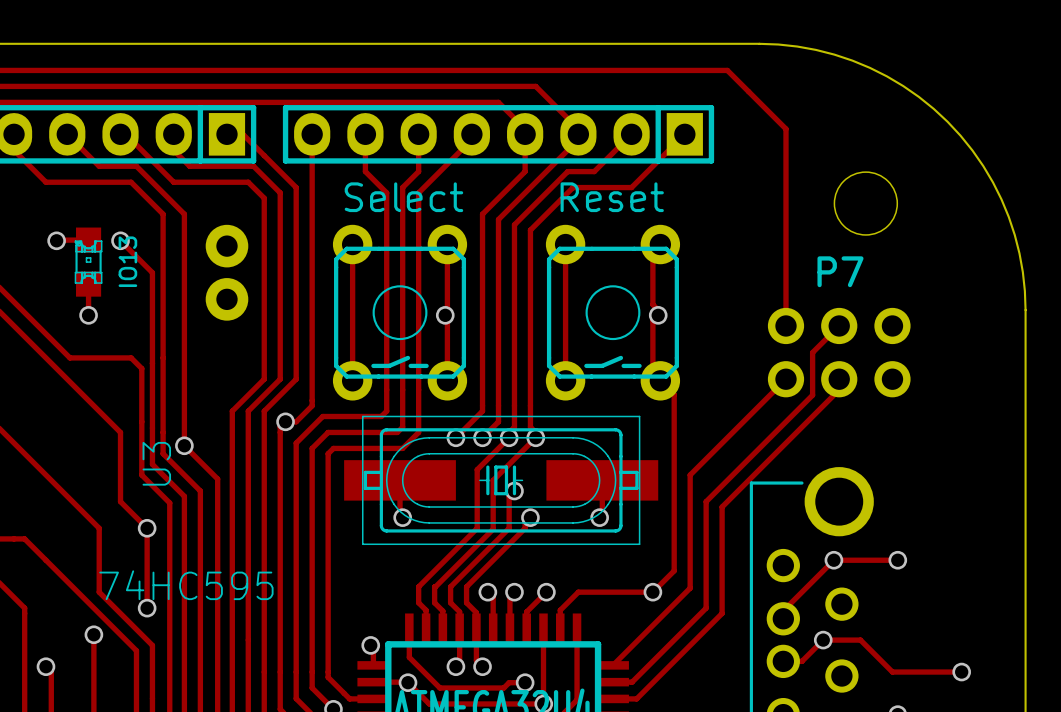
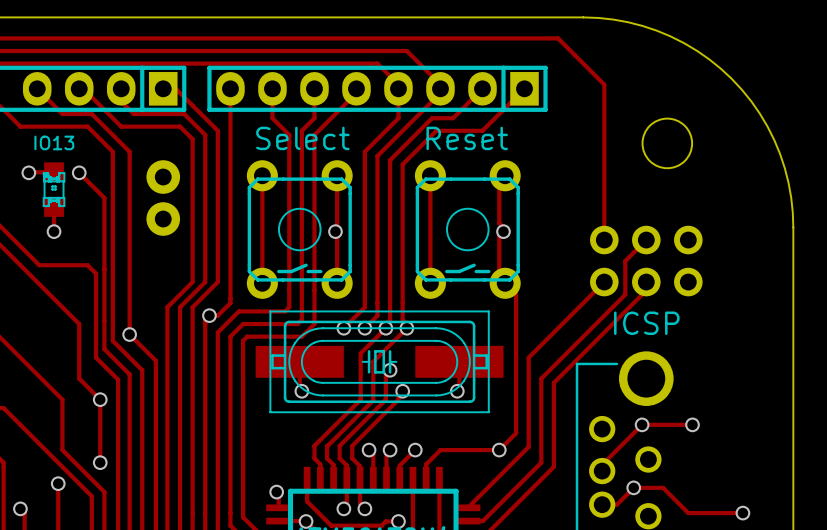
part value rotation: 0° (127, 261) -> 90° clockwise (54, 142)
P7 name: P7 (840, 271) -> none
P7 value: none -> ICSP (646, 323)
U3: 74HC595 (186, 521) -> none

